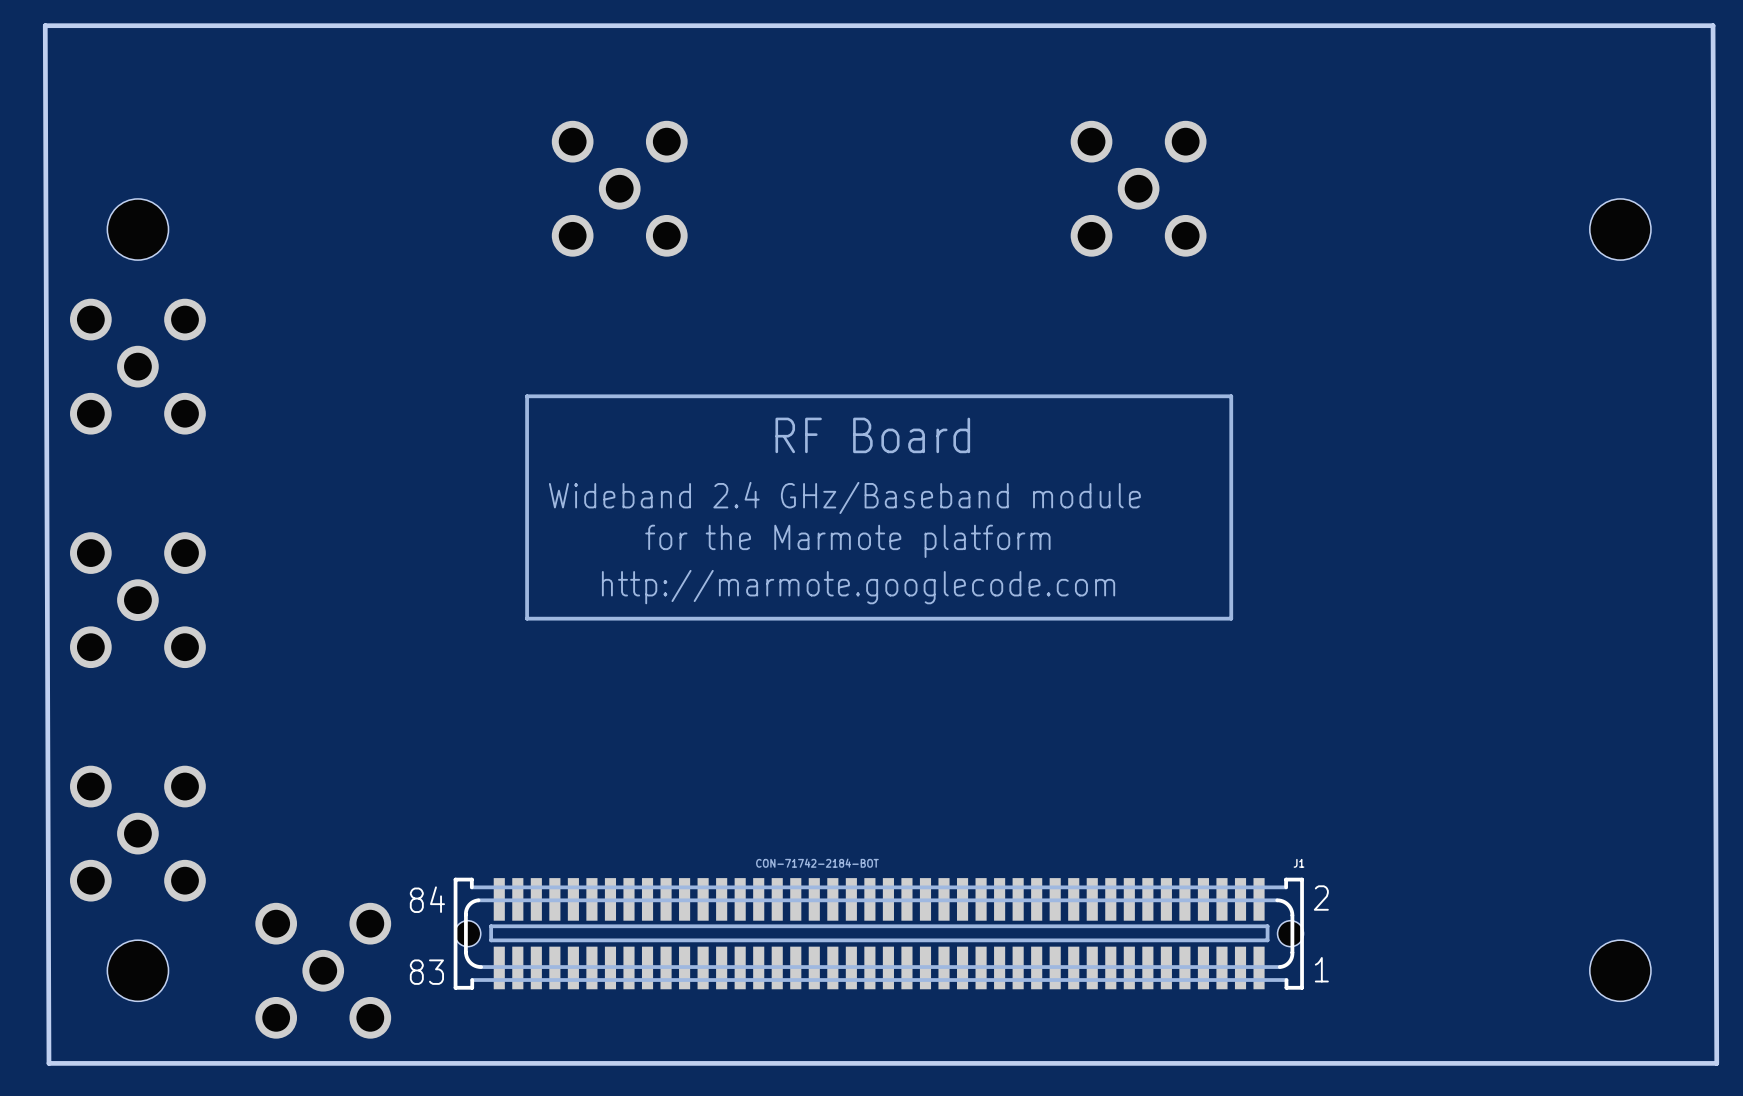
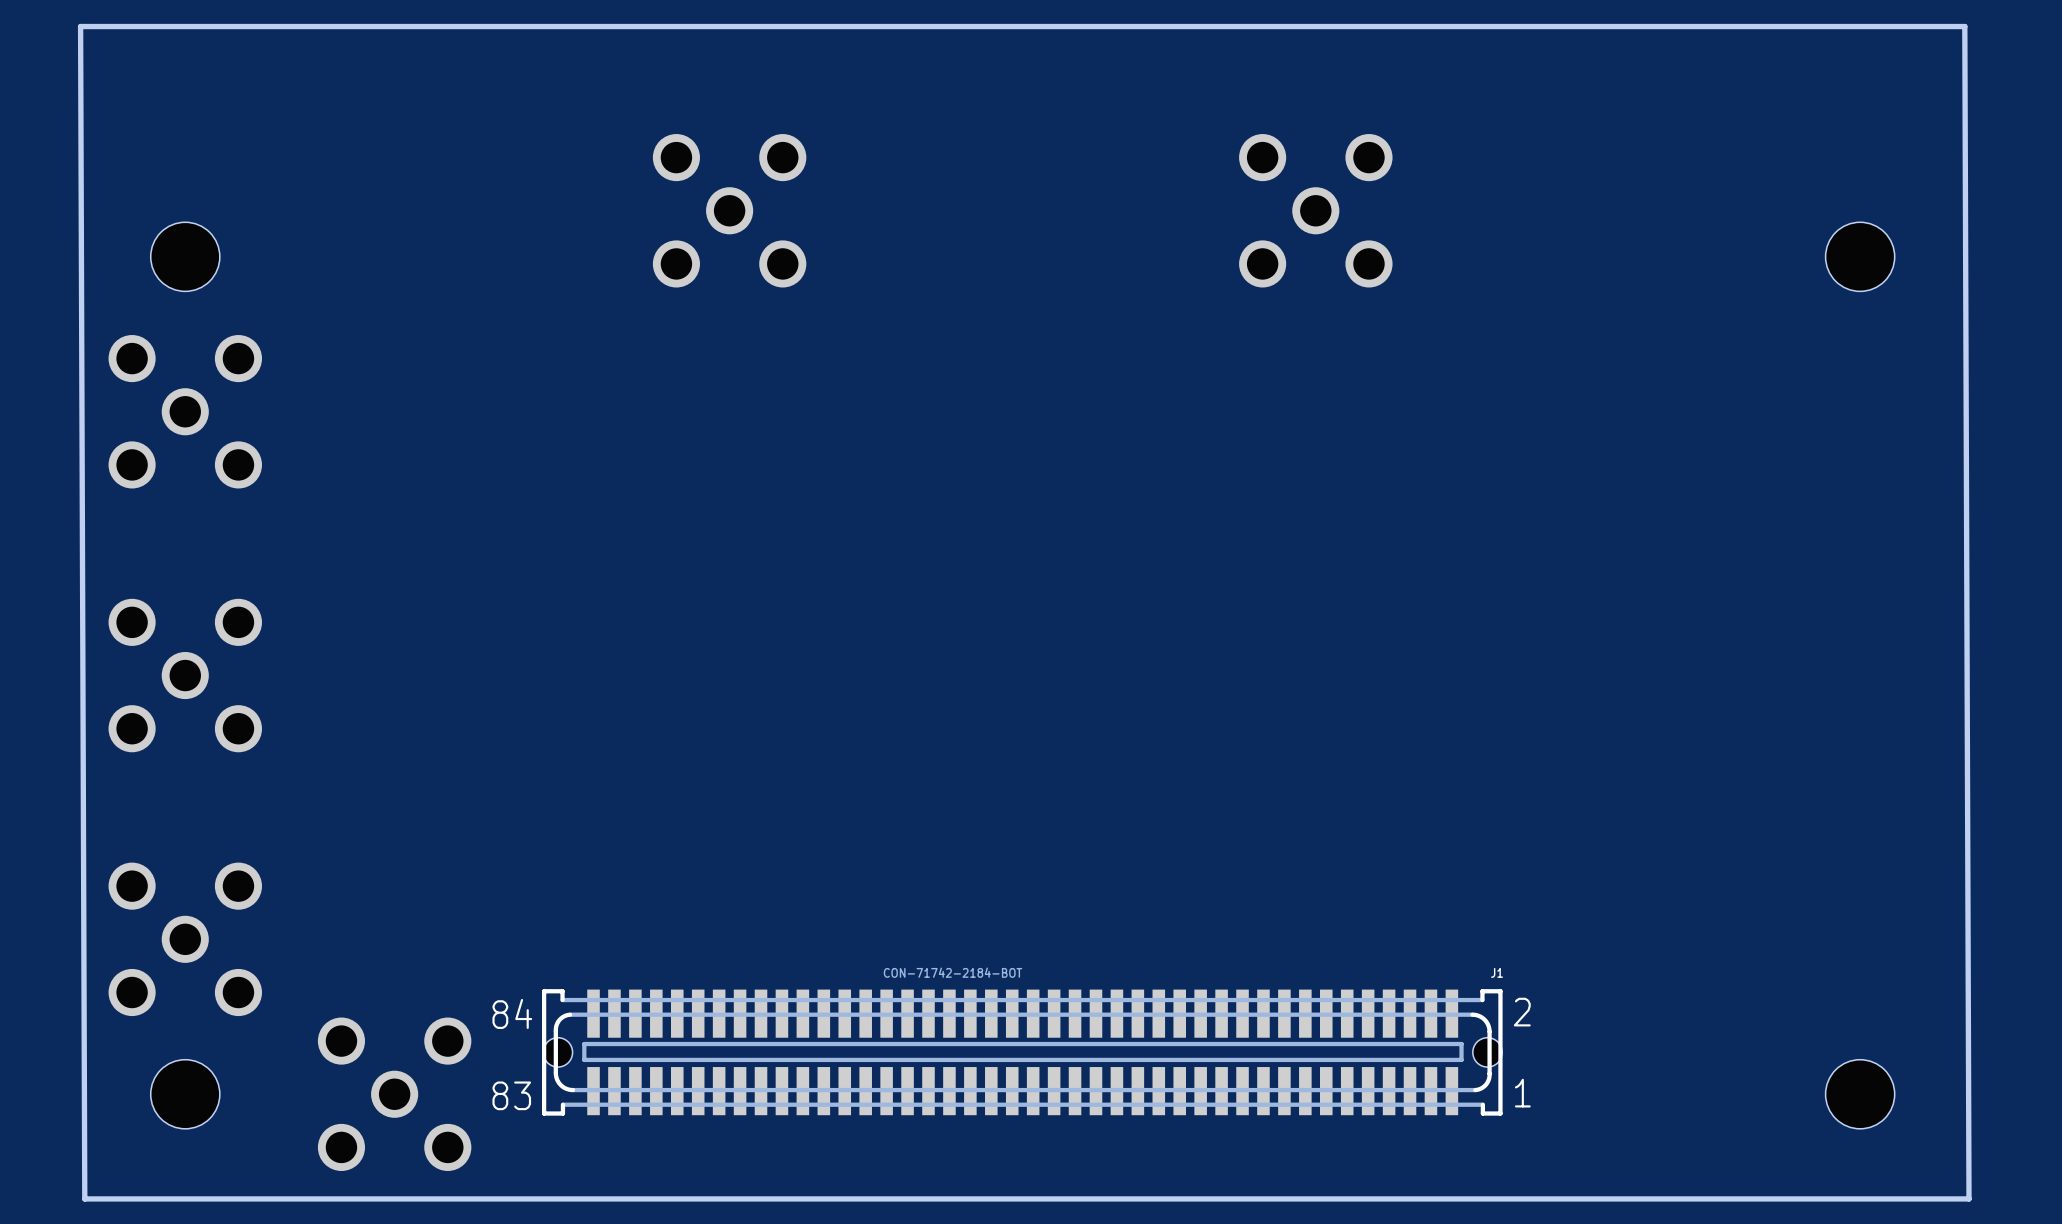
line: (1231, 396) (1231, 618) (527, 618) (527, 396) (1231, 396) -> none
text: RF Board (872, 435) -> none
text: Wideband 2.4 GHz/Baseband module (844, 497) -> none
text: for the Marmote platform (847, 541) -> none
text: http://marmote.googlecode.com (858, 587) -> none

